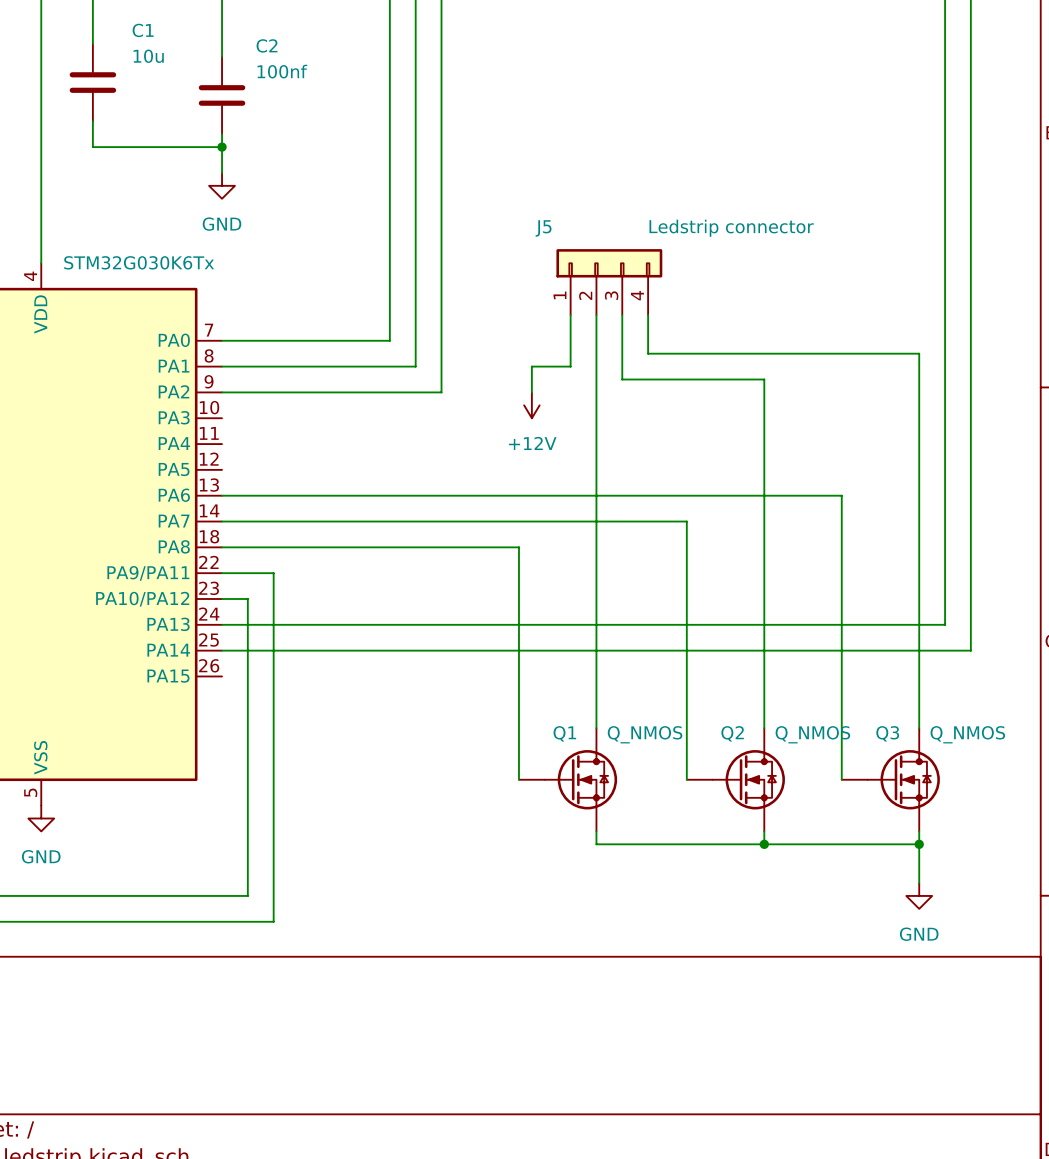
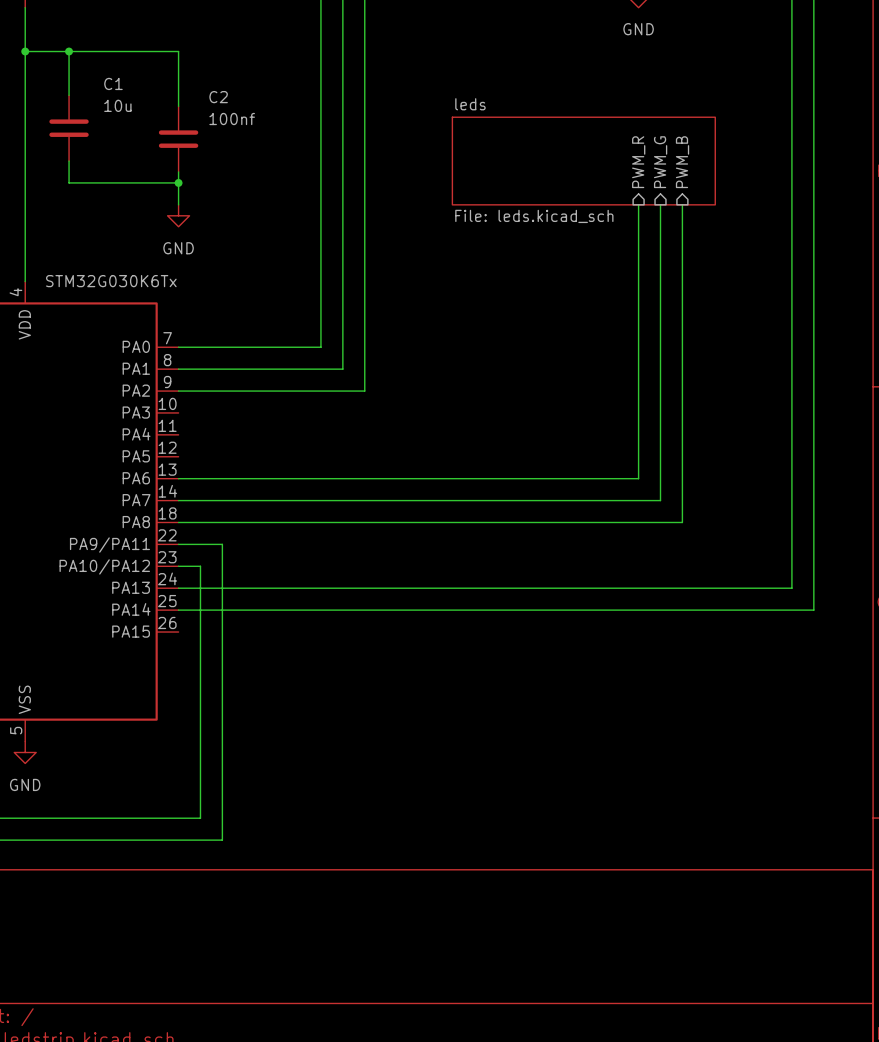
sheet leds: none -> File: leds.kicad_sch (583, 161)
sheet pin: none -> PWM_R (638, 162)
sheet pin: none -> PWM_G (660, 162)
sheet pin: none -> PWM_B (682, 162)
J5: Ledstrip connector (609, 282) -> none
wire: (570, 314) (570, 366) (531, 366) (531, 392) -> none
wire: (596, 314) (596, 728) -> none
wire: (622, 314) (622, 379) (764, 379) -> (638, 204) (638, 380)
wire: (648, 314) (648, 353) (919, 353) (919, 728) -> none
power symbol: +12V (531, 405) -> none
wire: (686, 521) (686, 779) -> (572, 500) (660, 500) (660, 204)
wire: (518, 547) (518, 779) -> (430, 522) (682, 522) (682, 204)
wire: (764, 728) (764, 495) (841, 495) (841, 779) -> none
Q1: Q_NMOS (568, 779) -> none
Q2: Q_NMOS (735, 779) -> none
Q3: Q_NMOS (890, 779) -> none
wire: (596, 831) (596, 844) (919, 844) -> none
wire: (764, 831) (764, 844) -> none
wire: (919, 831) (919, 883) -> none
junction: (764, 844) -> none
junction: (919, 844) -> none
power symbol: GND (919, 895) -> none

